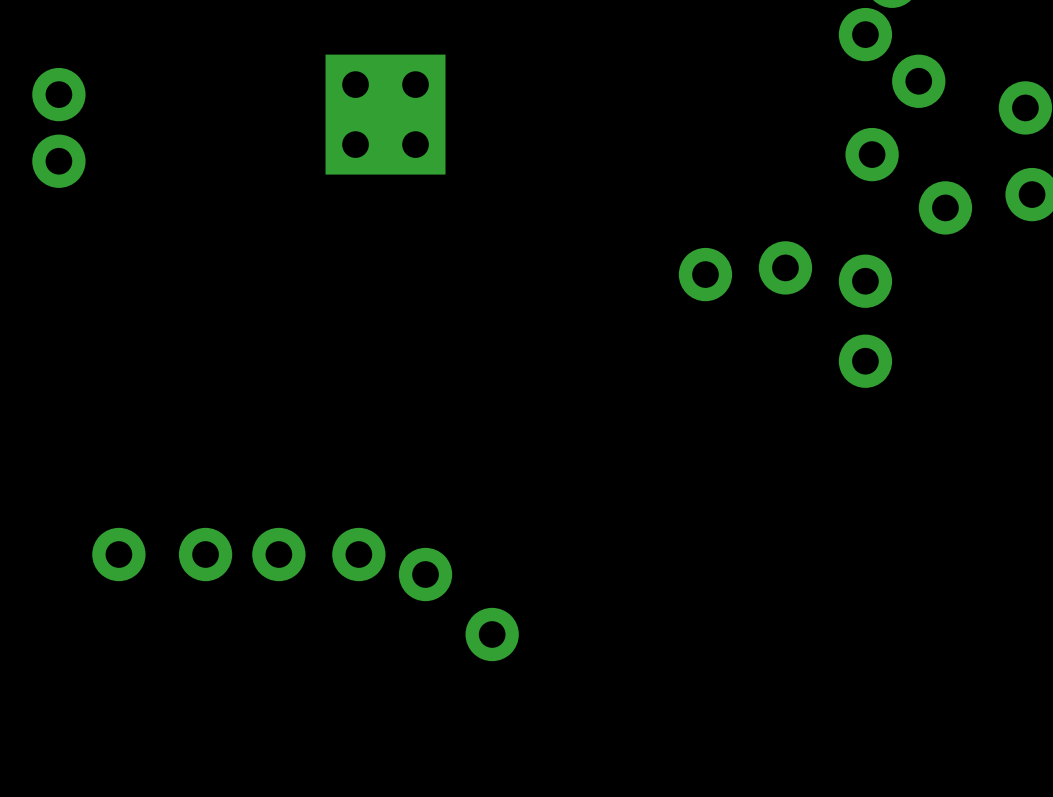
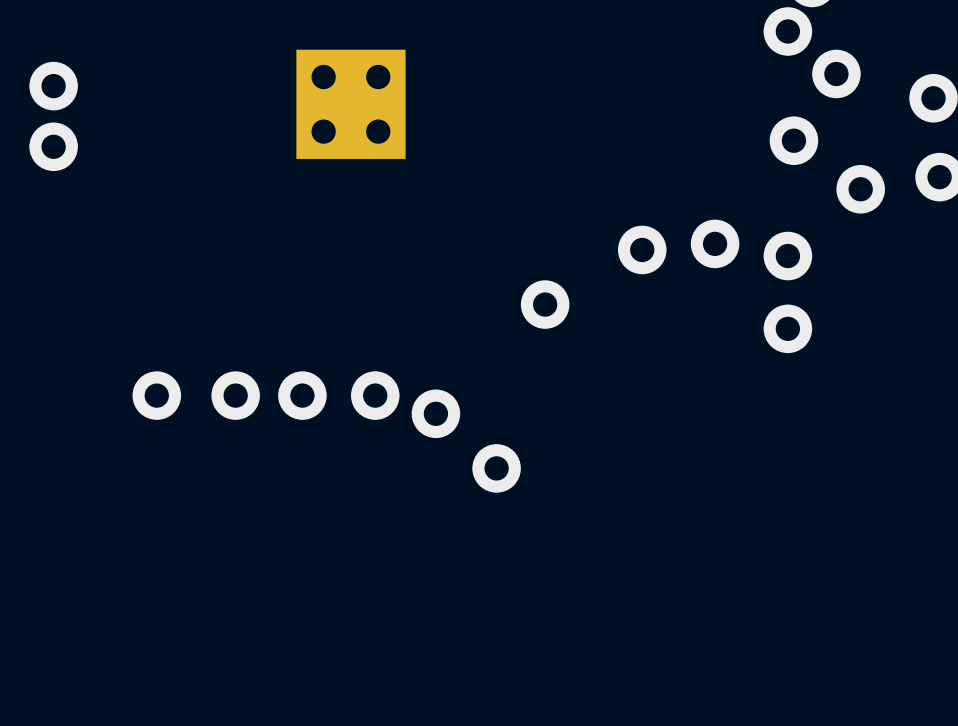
via: none -> (545, 304)
via: none -> (156, 395)
via: none -> (235, 395)
via: none -> (302, 395)
via: none -> (375, 395)
via: none -> (435, 413)
via: none -> (496, 468)
via: (118, 554) -> none
via: (205, 554) -> none
via: (278, 554) -> none
via: (358, 554) -> none
via: (425, 574) -> none
via: (492, 634) -> none

